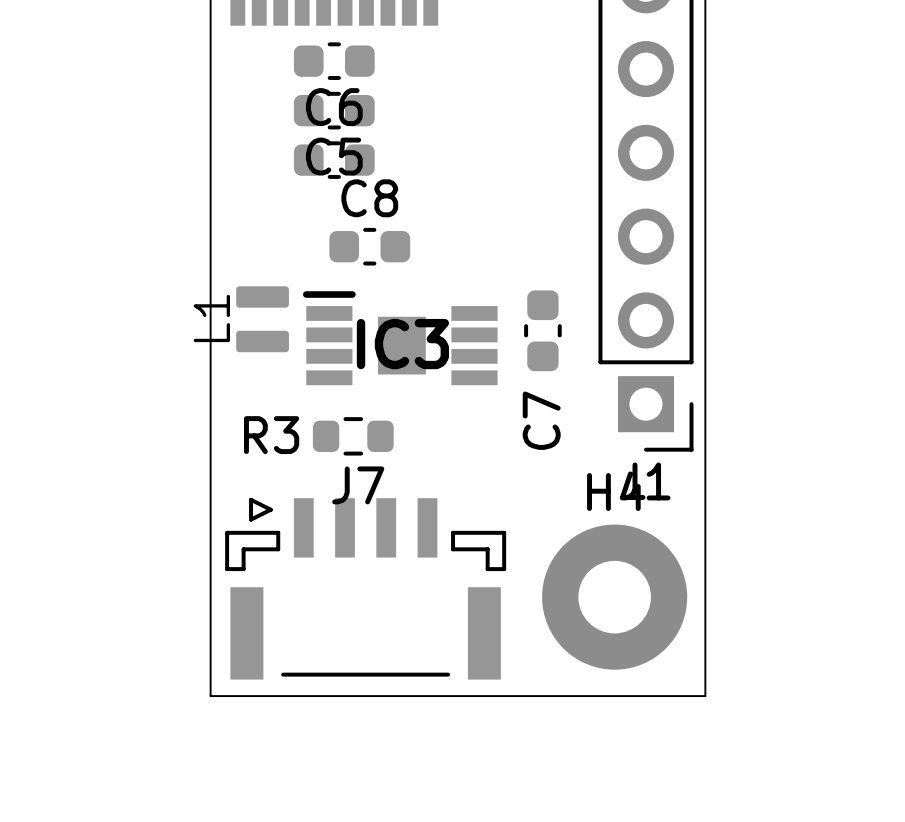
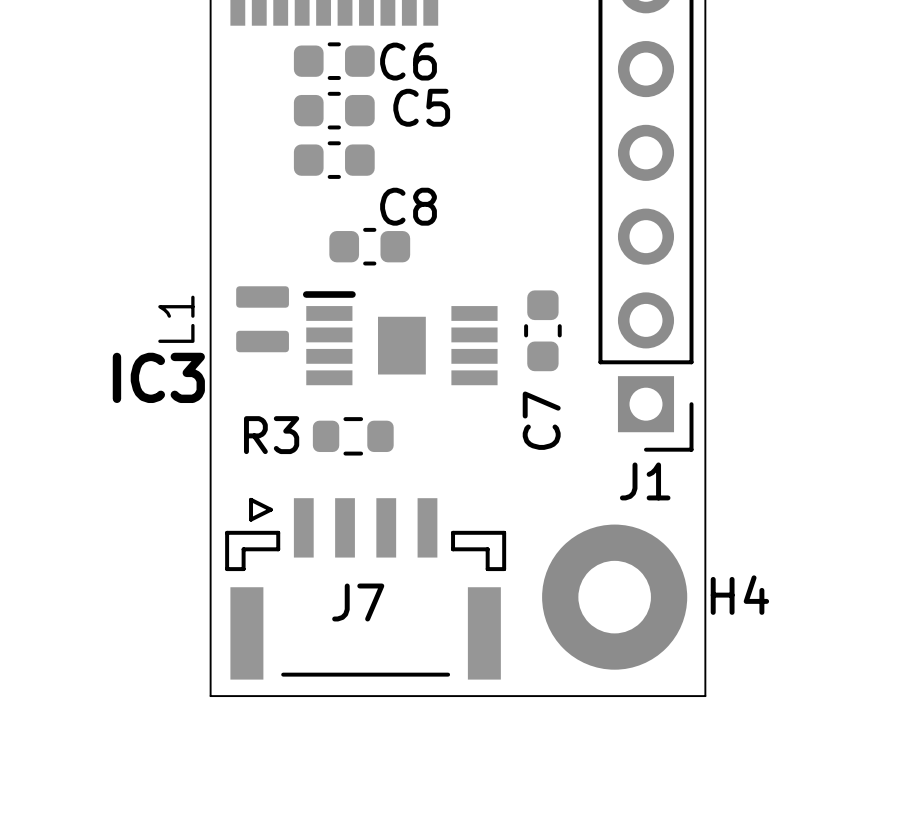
C6 name position: C6 (334, 107) -> C6 (408, 61)
C5 name position: C5 (334, 156) -> C5 (421, 107)
C8 name position: C8 (369, 198) -> C8 (408, 206)
L1 name position: L1 (211, 318) -> L1 (176, 319)
IC3 name position: IC3 (402, 344) -> IC3 (158, 377)
J7 name position: J7 (358, 485) -> J7 (358, 602)
H4 name position: H4 (616, 491) -> H4 (739, 595)

